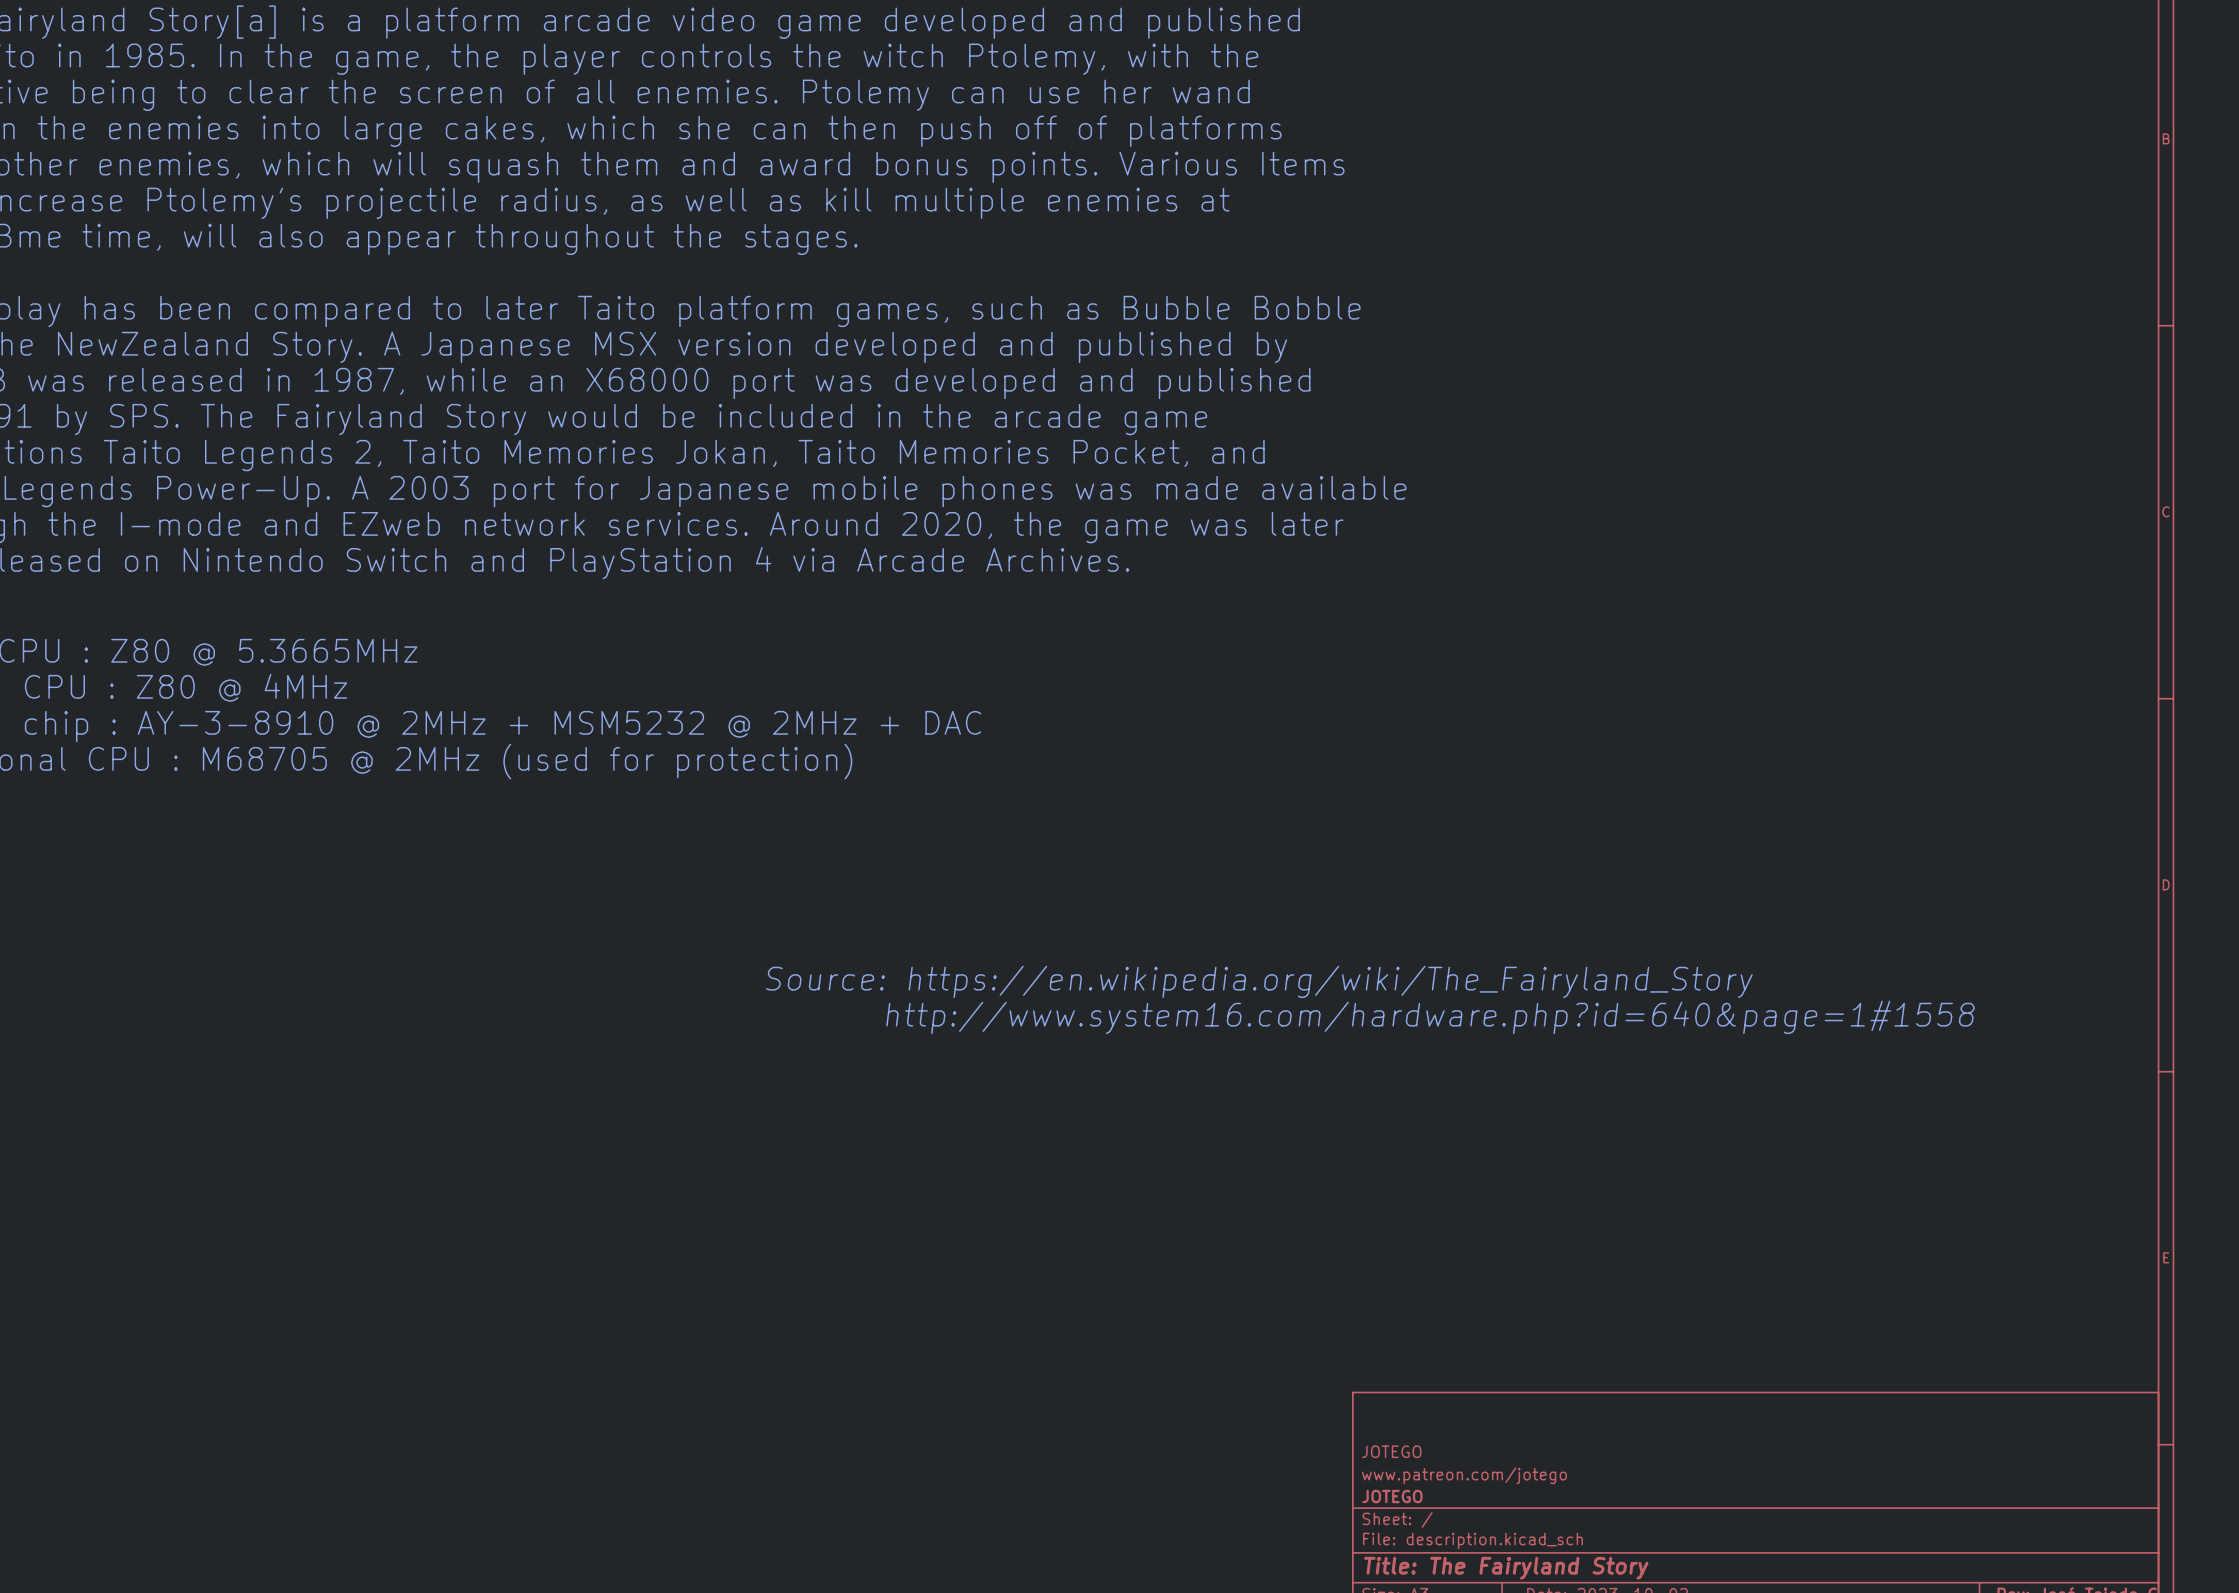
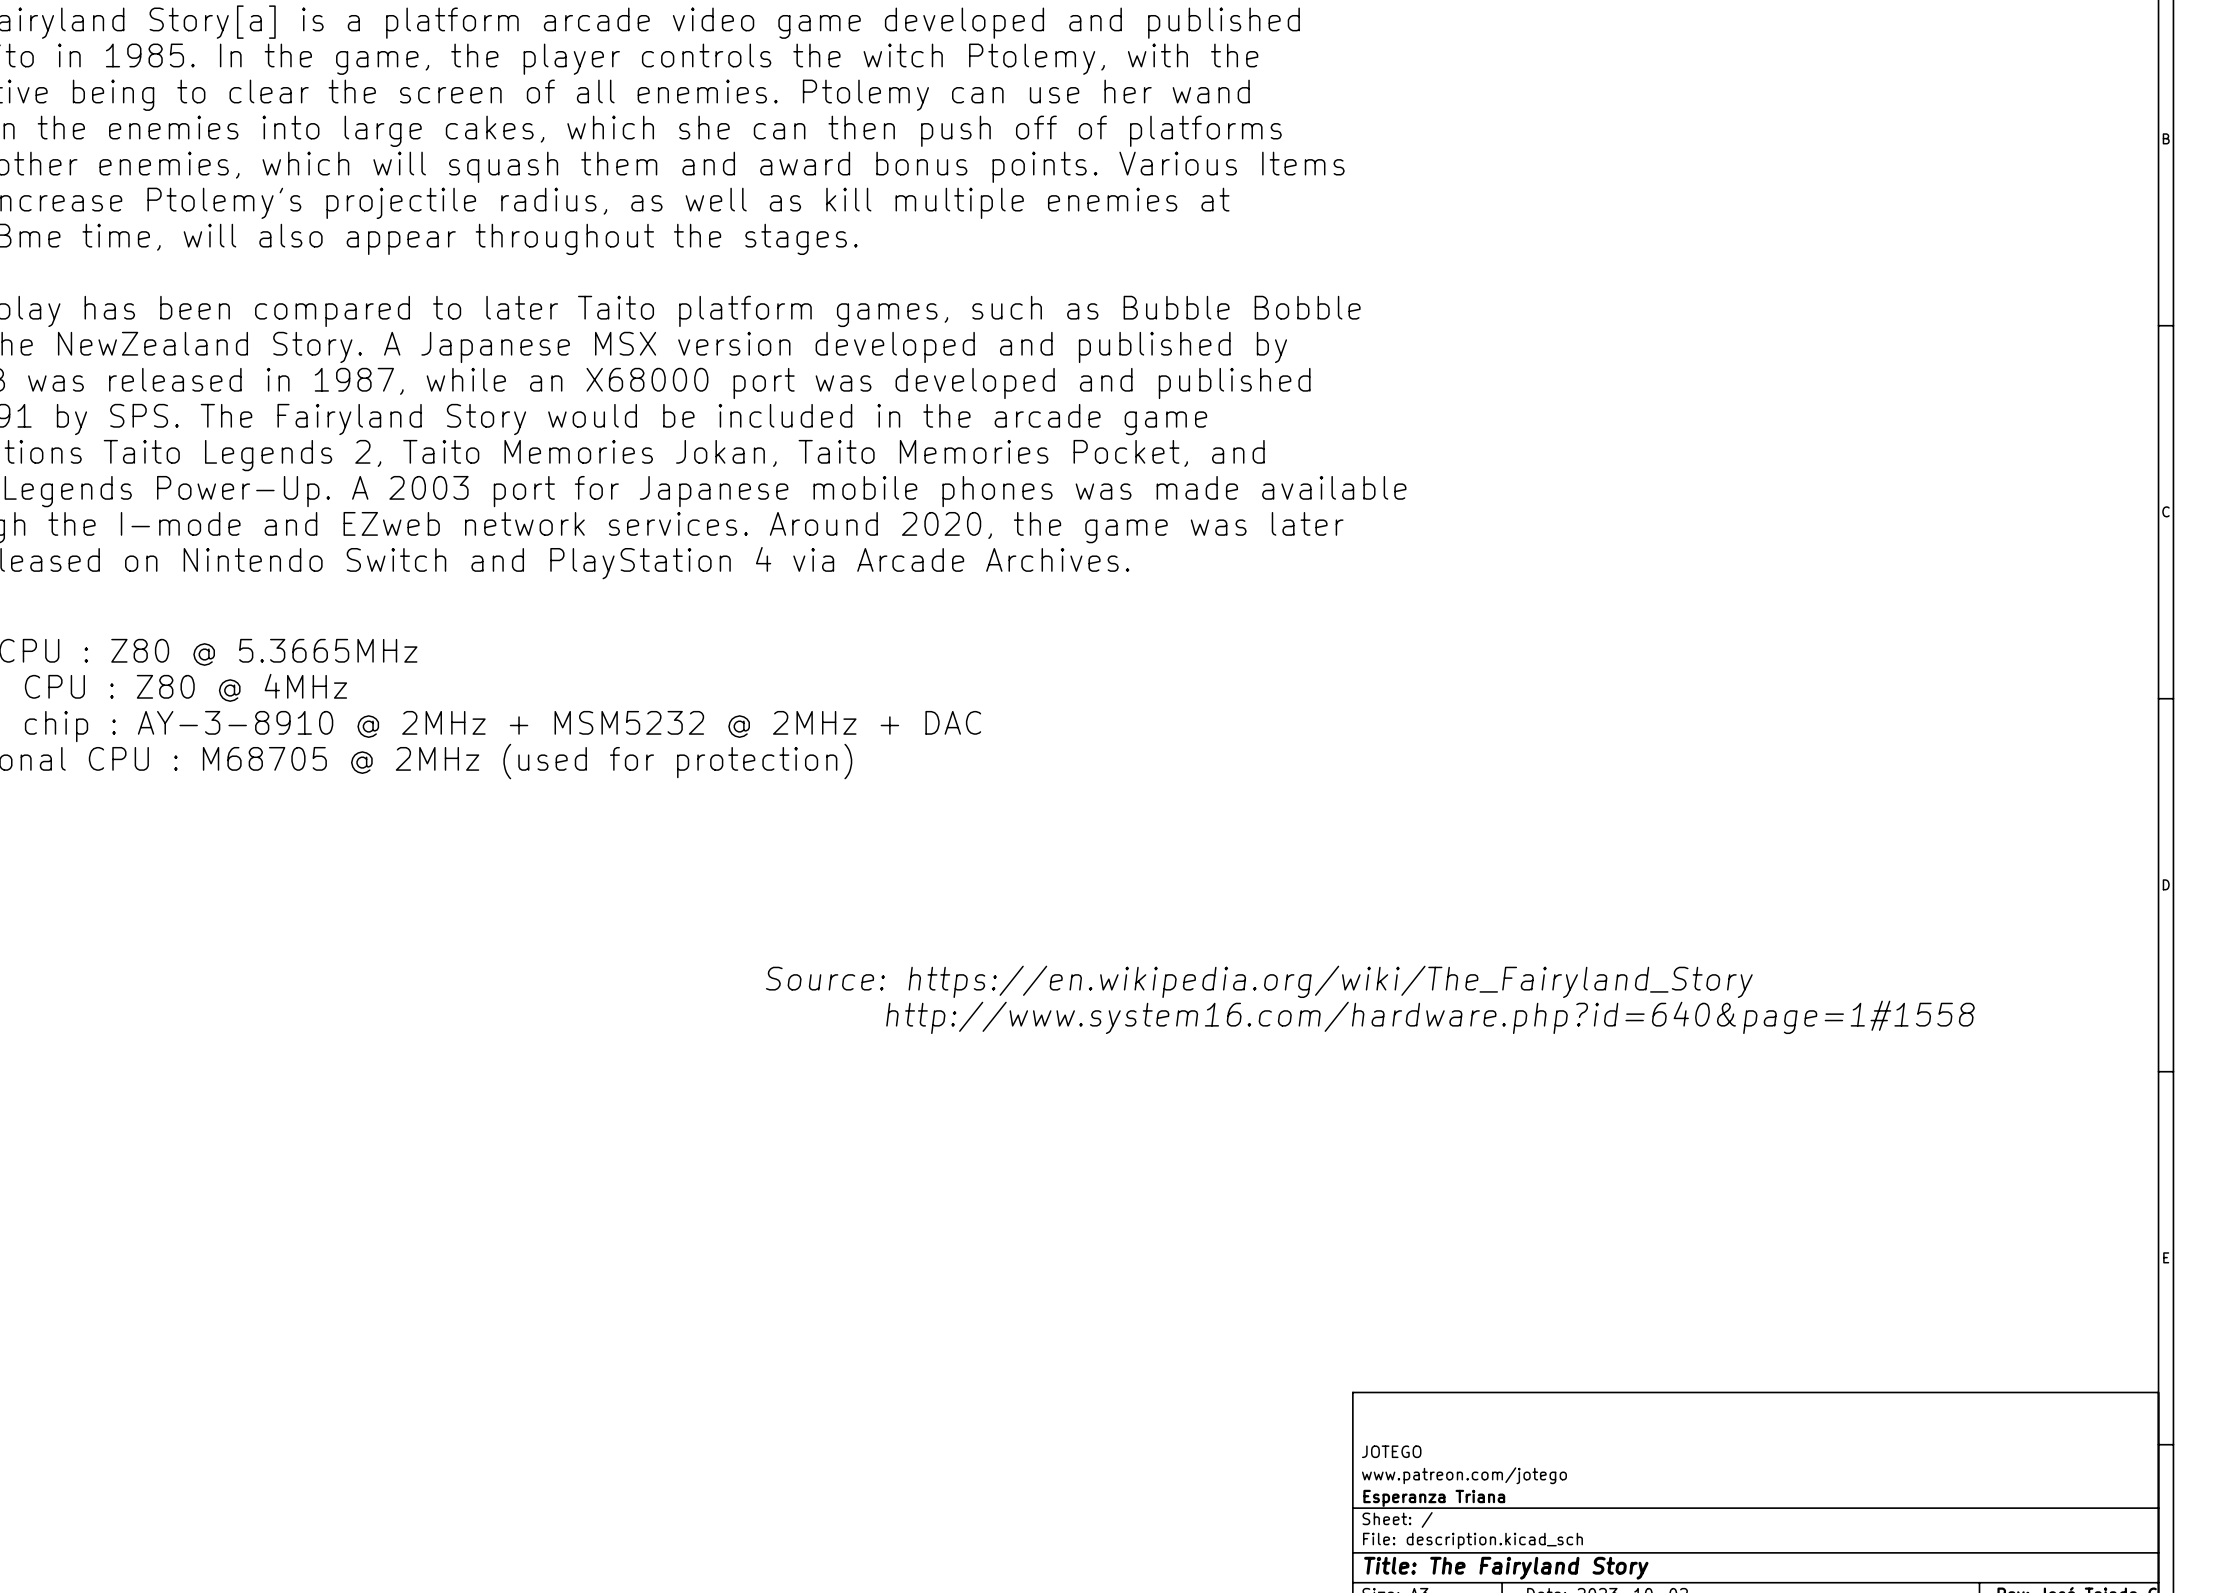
title block: JOTEGO (1392, 1496) -> Esperanza Triana (1434, 1498)

